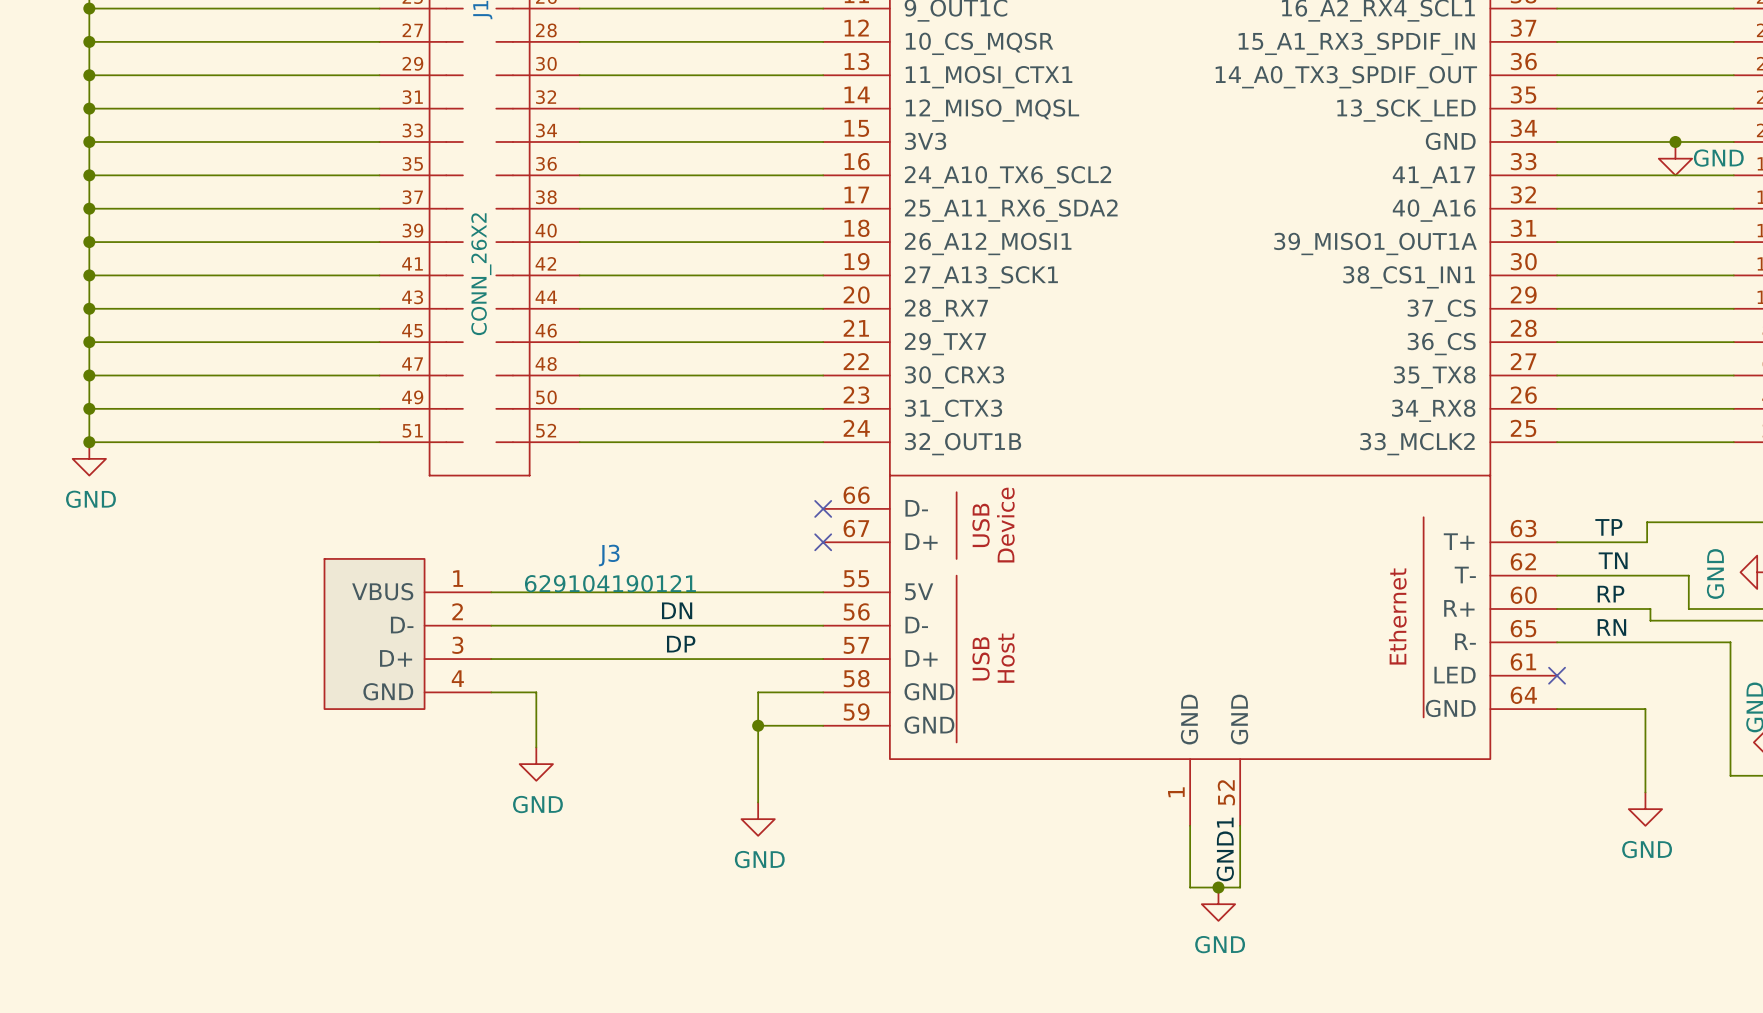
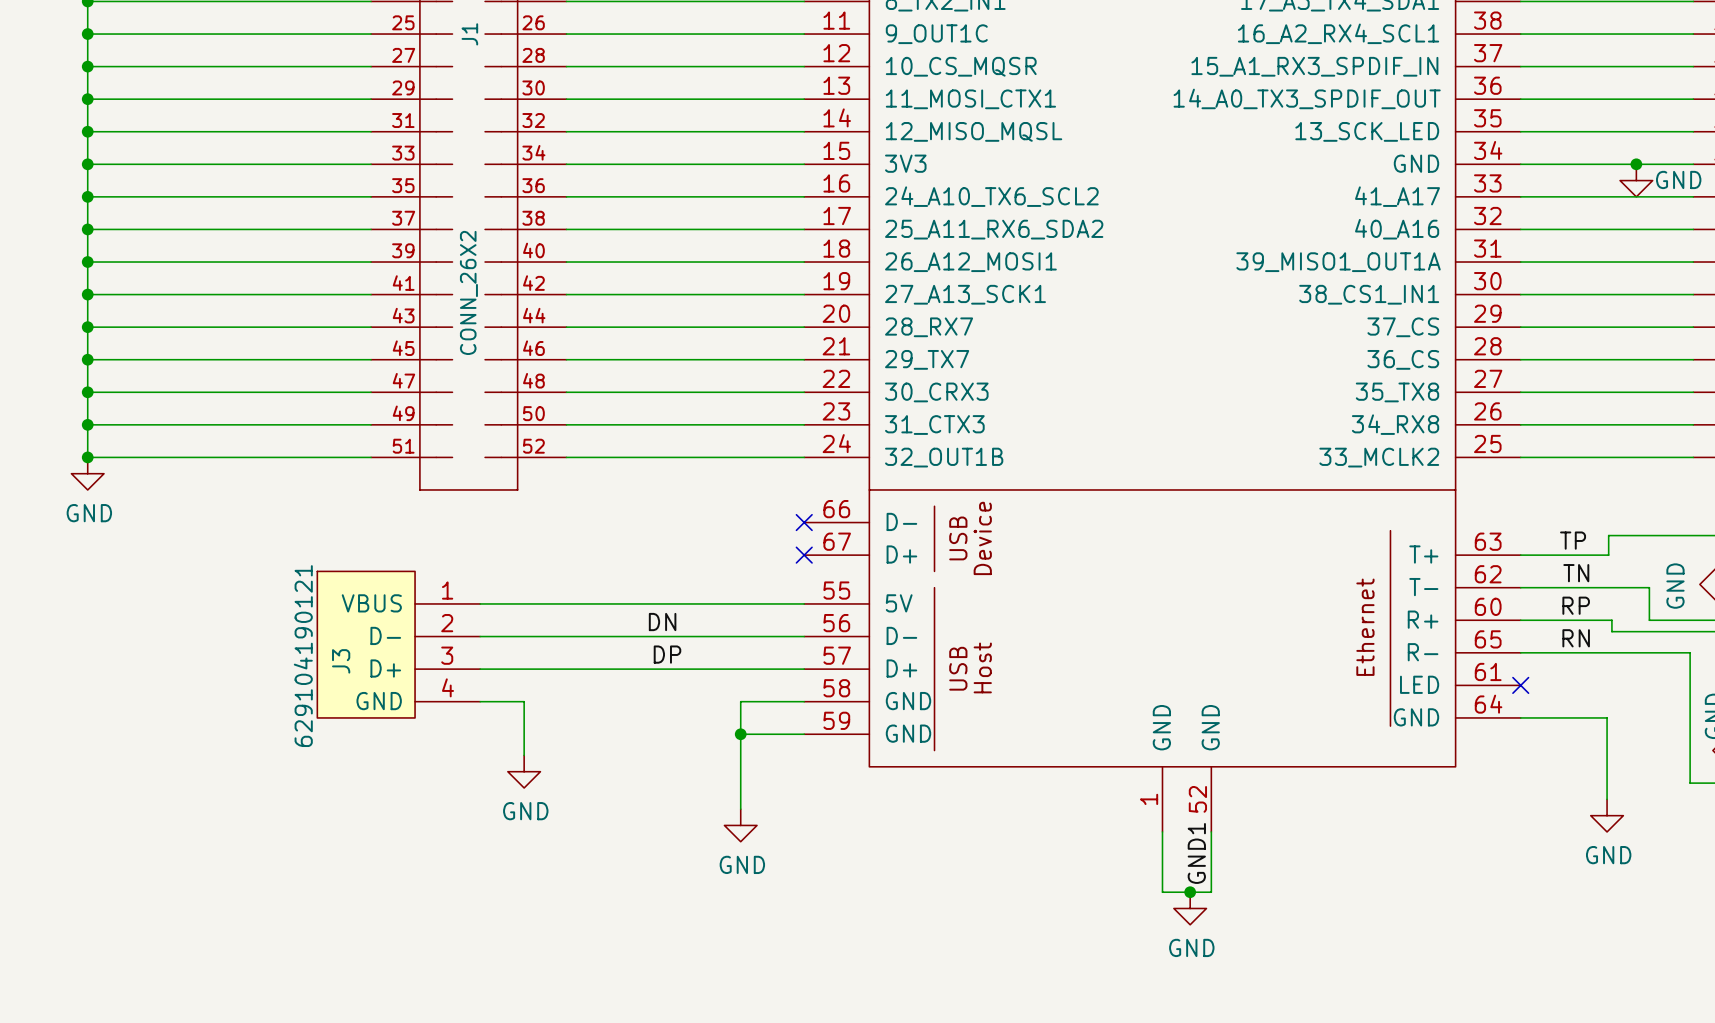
J3 name rotation: 0° (609, 555) -> 90° counterclockwise (341, 661)
J3 name position: J3 (609, 555) -> J3 (341, 661)
J3 value rotation: 0° (610, 583) -> 90° counterclockwise (303, 656)
J3 value position: 629104190121 (610, 583) -> 629104190121 (303, 656)

